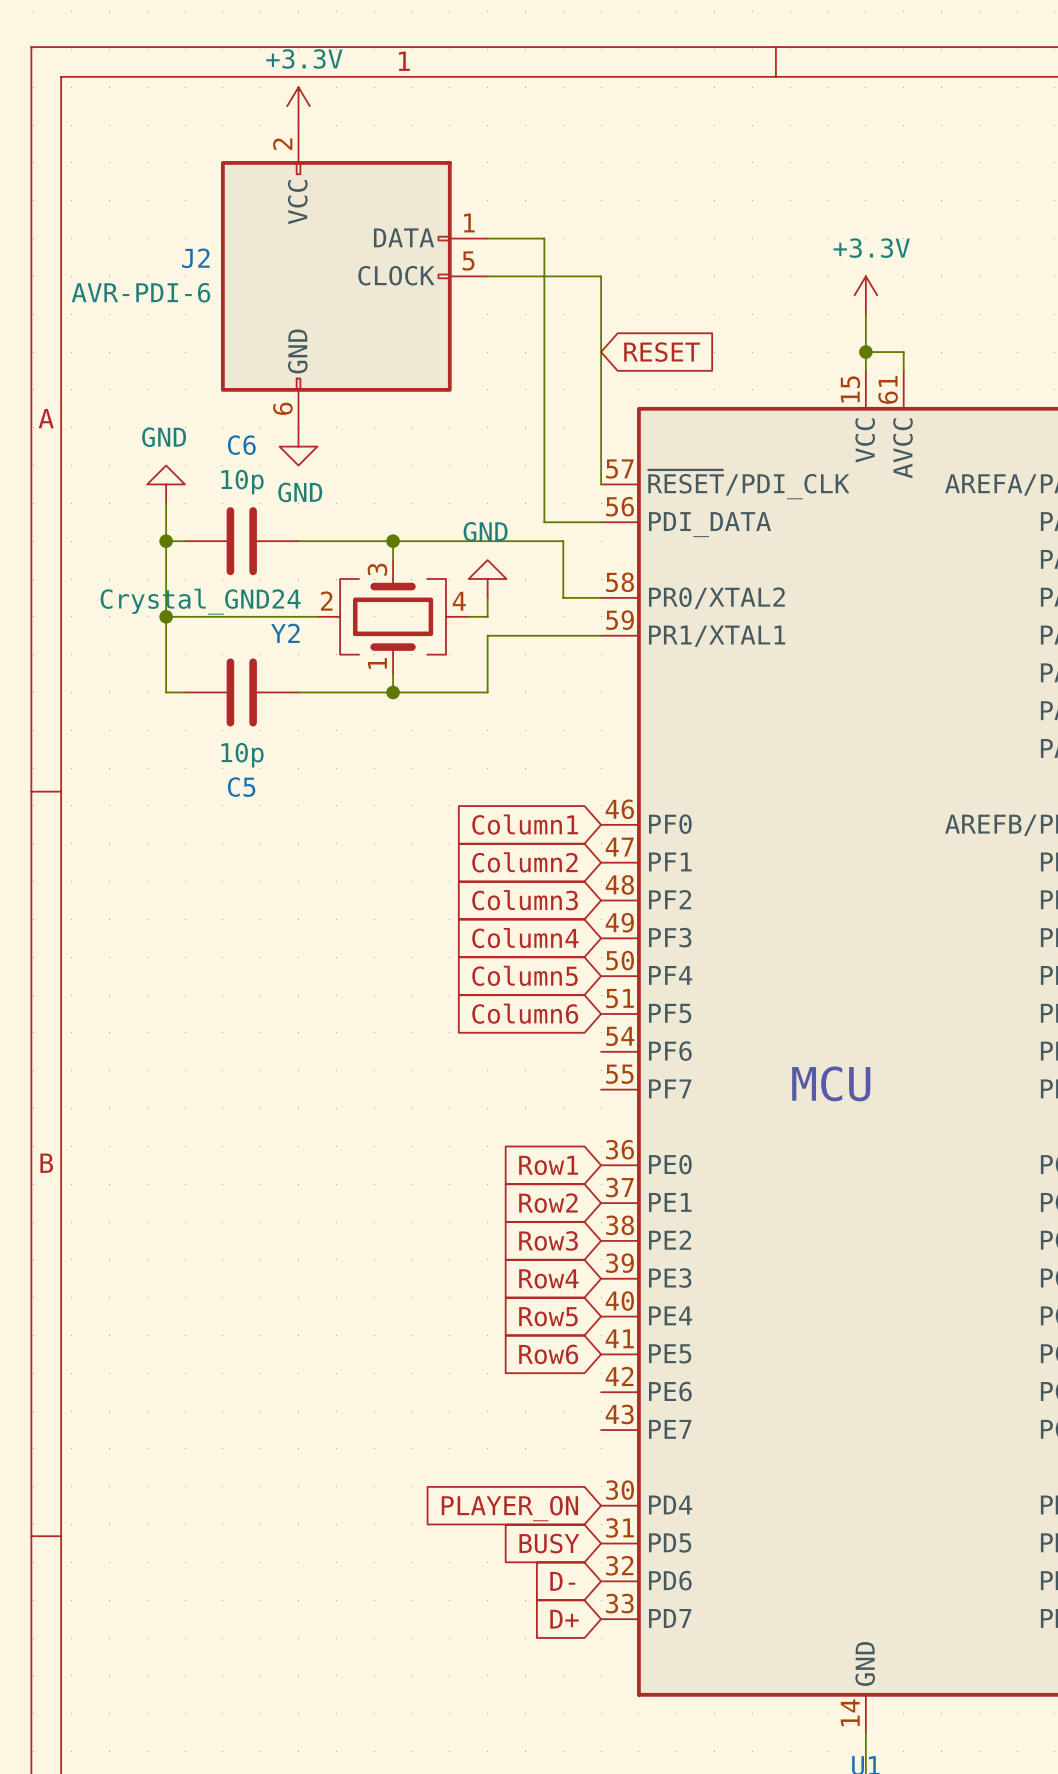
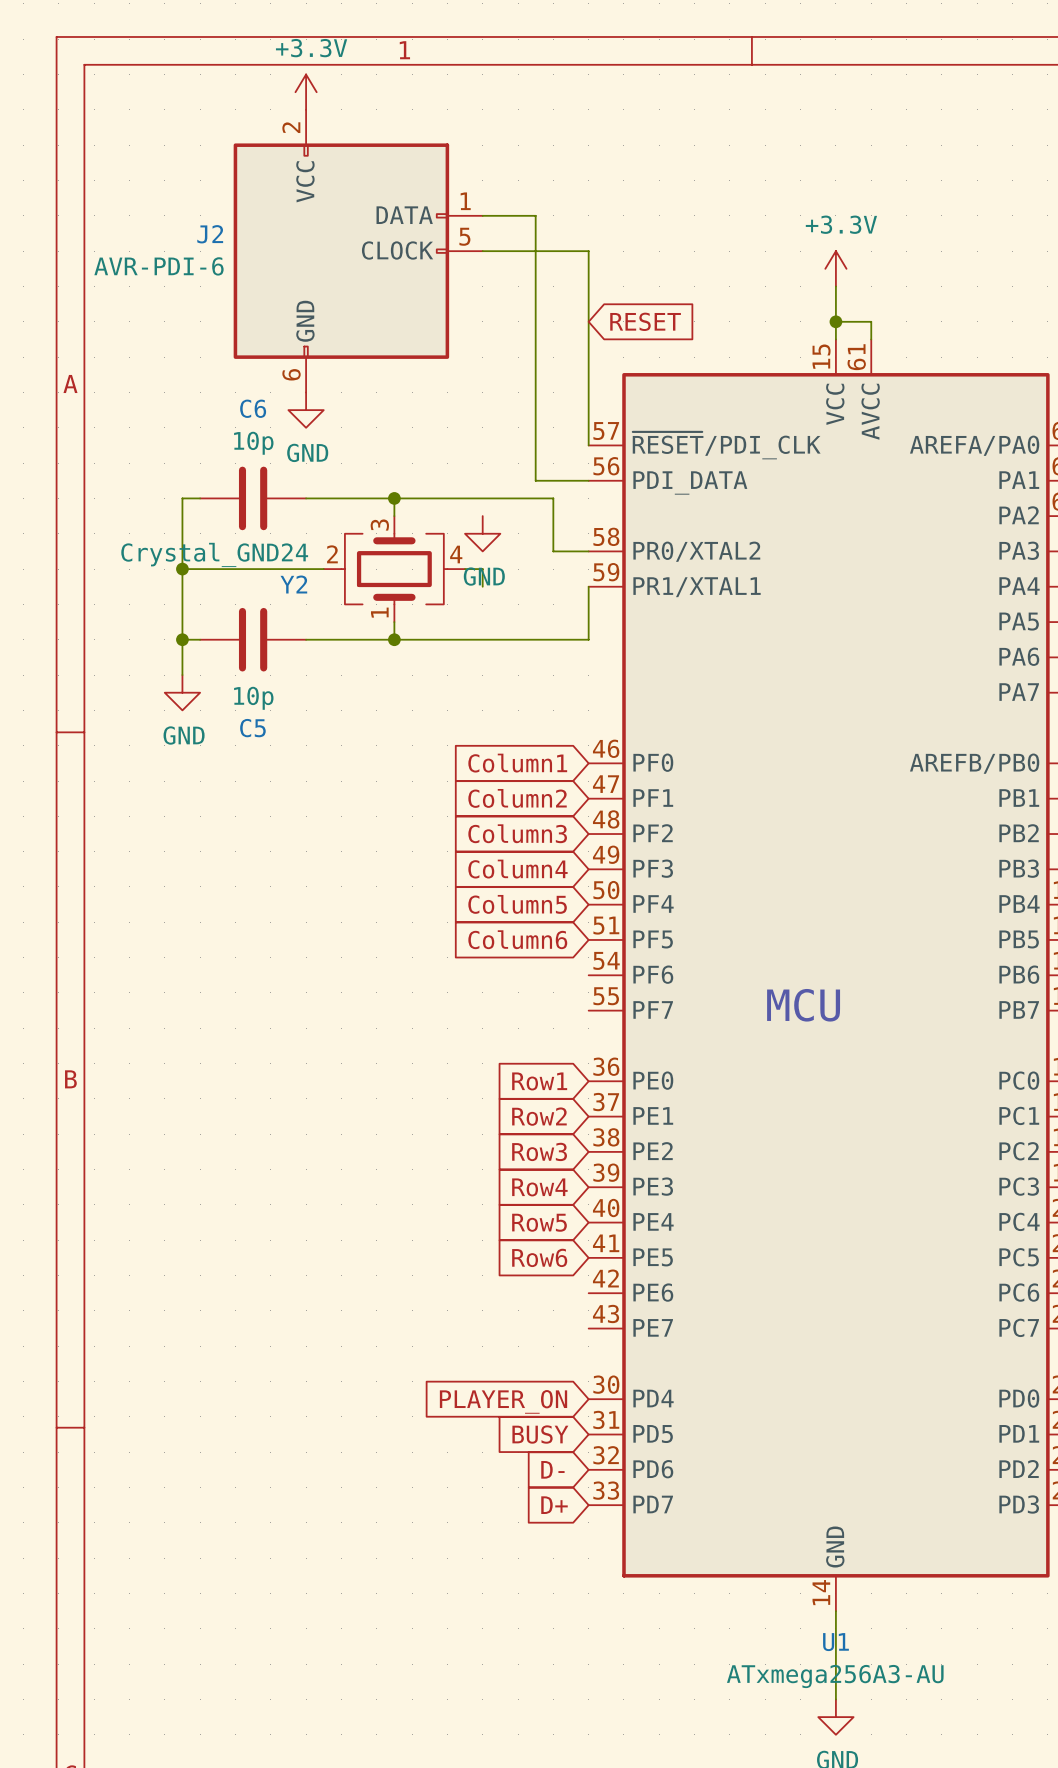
power symbol rotation: 0° (166, 484) -> 180° (182, 692)
power symbol position: GND (166, 484) -> GND (182, 692)
wire: (166, 503) (166, 541) -> (182, 639) (182, 675)
junction: (166, 541) -> none
power symbol rotation: 0° (487, 579) -> 180° (482, 533)
wire: (487, 597) (487, 616) -> (482, 586) (482, 569)
wire: (601, 635) (487, 635) (487, 692) -> (588, 586) (588, 639) (482, 639)
junction: none -> (182, 639)

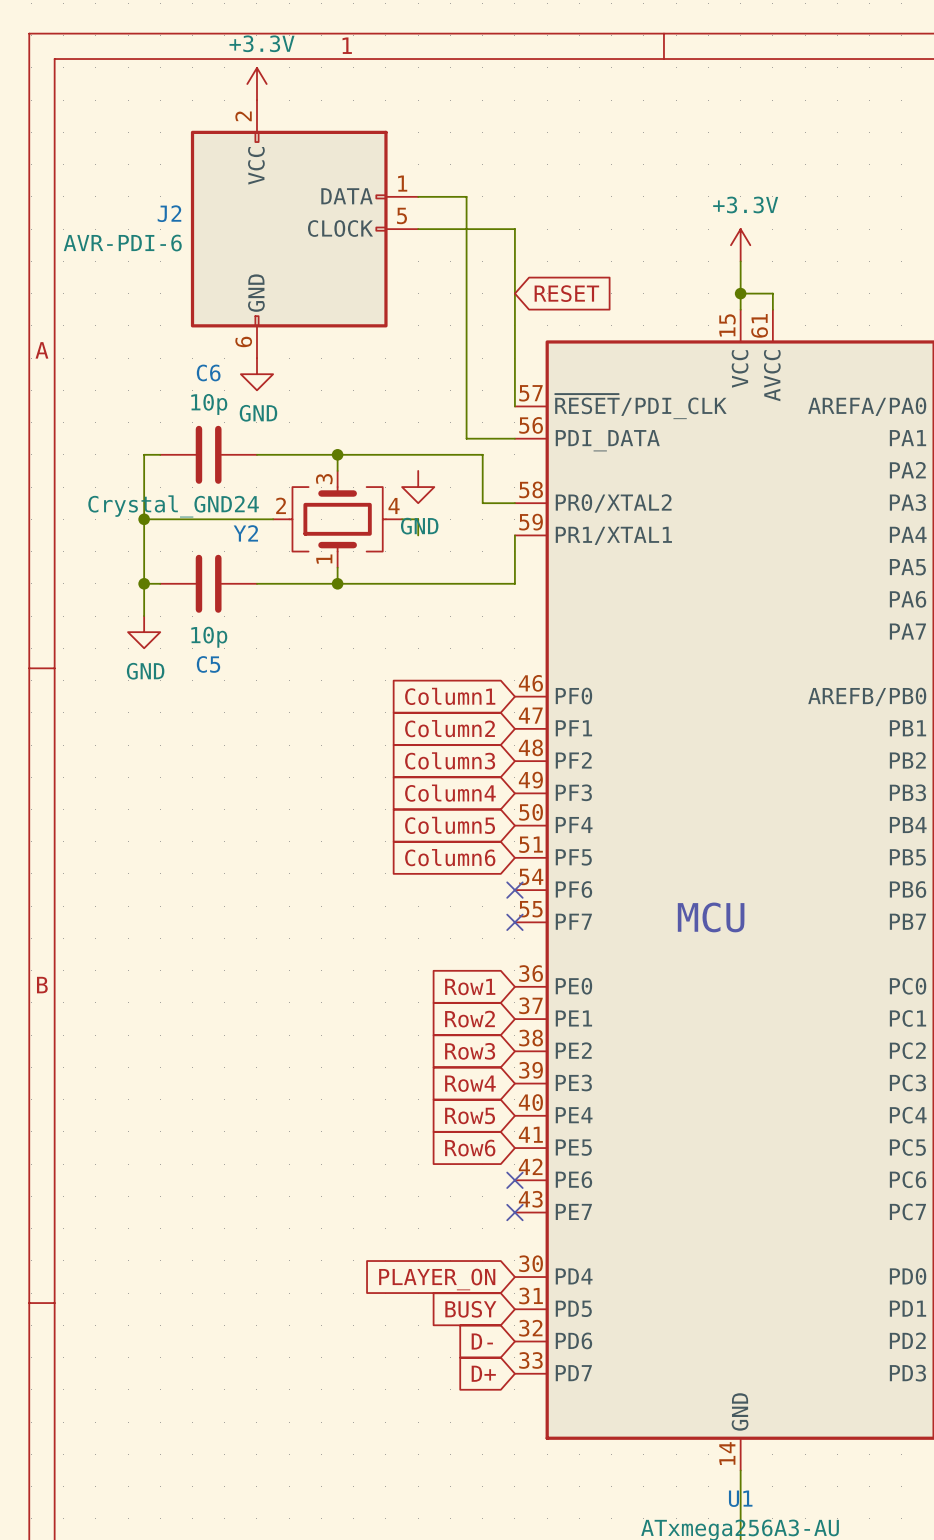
no-connect mark: none -> (514, 890)
no-connect mark: none -> (514, 922)
no-connect mark: none -> (514, 1180)
no-connect mark: none -> (514, 1212)

